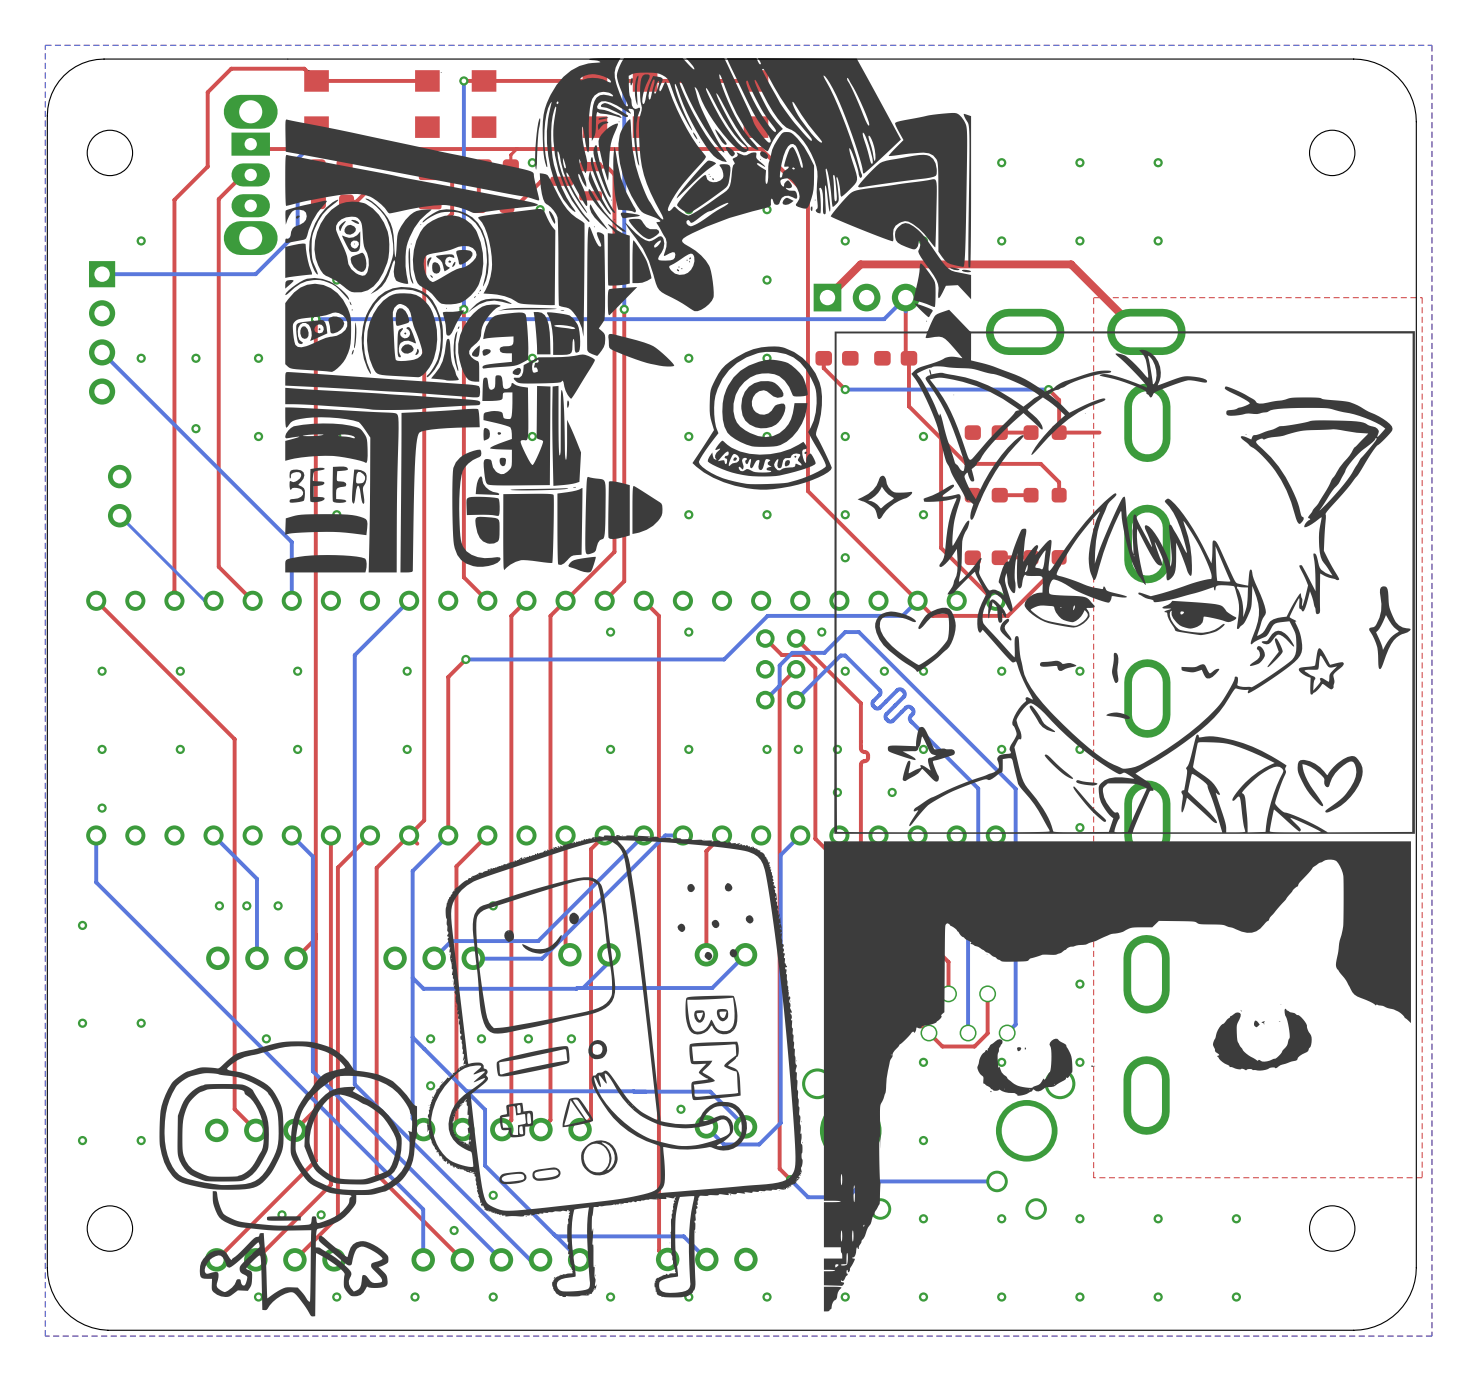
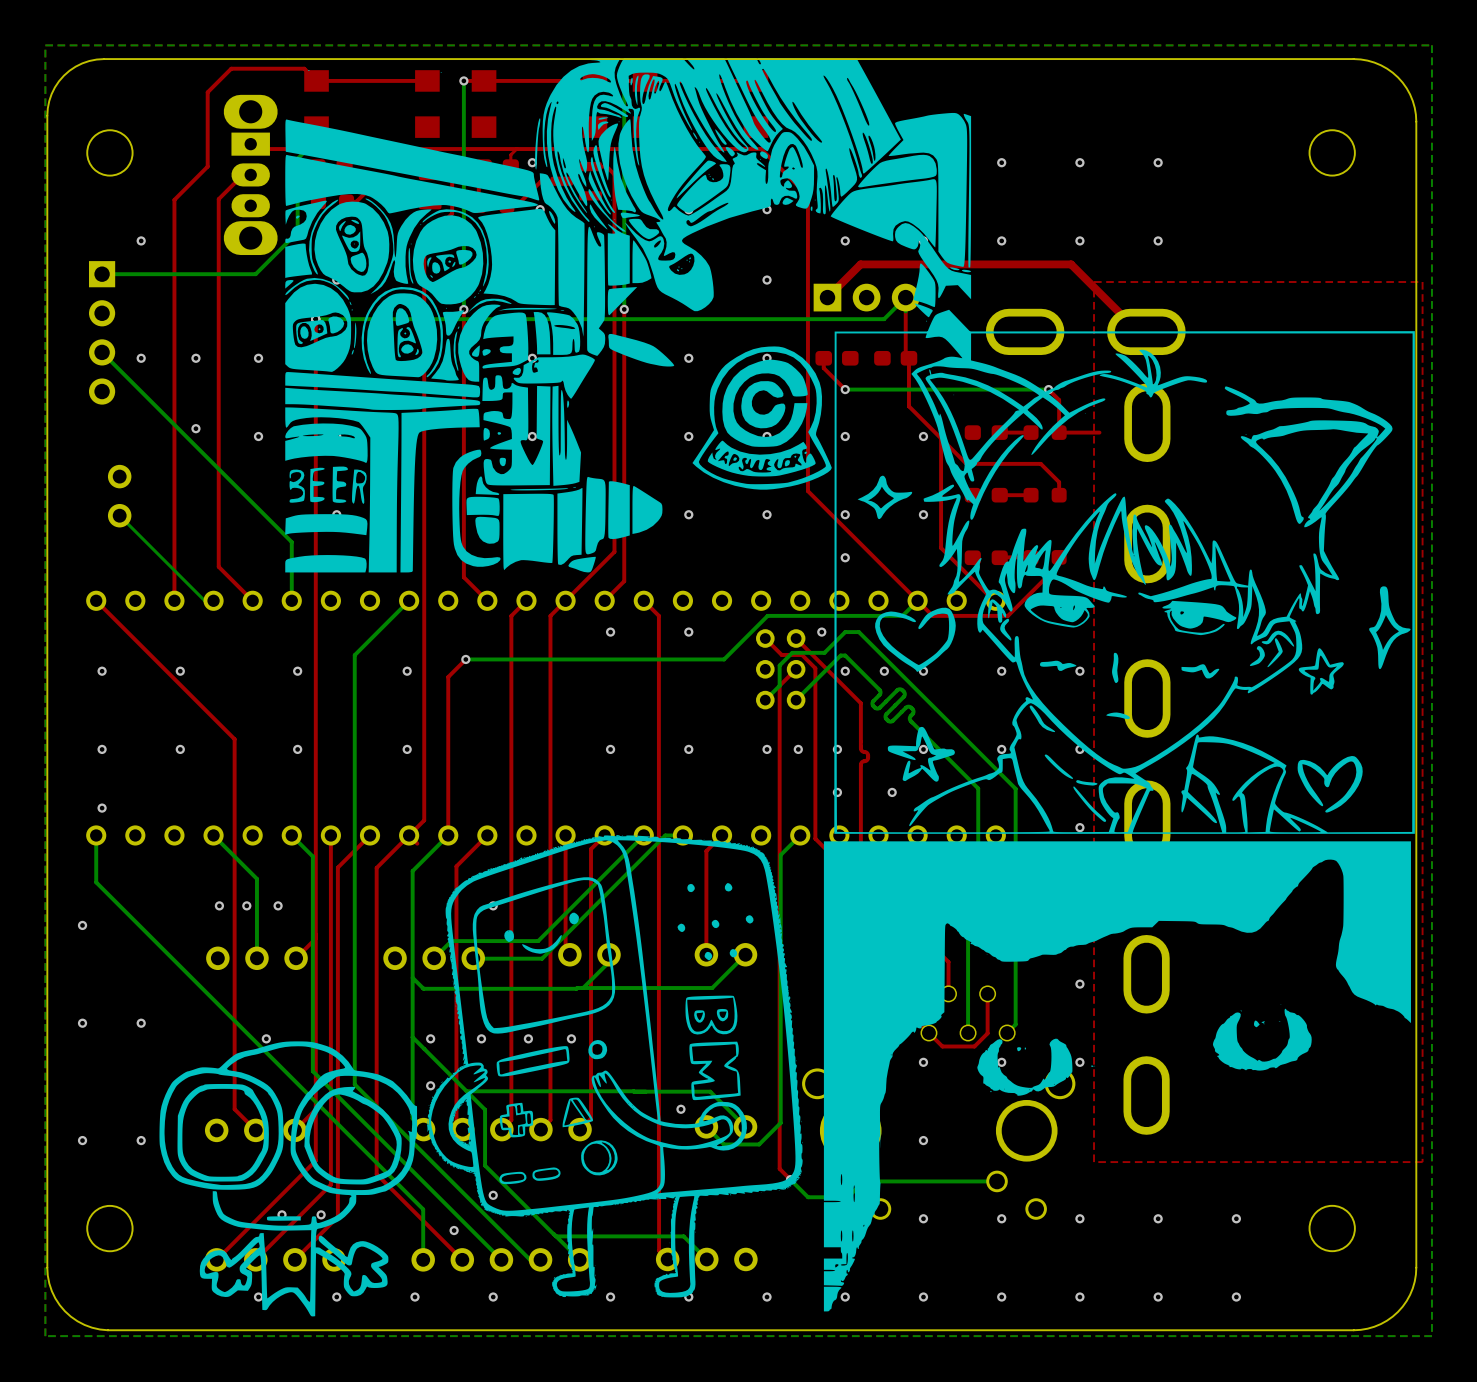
top zone outline: (1422, 297) (1093, 297) (1093, 1177) (1422, 1177) (1422, 297) -> (1422, 282) (1094, 282) (1094, 1162) (1422, 1162) (1422, 282)

